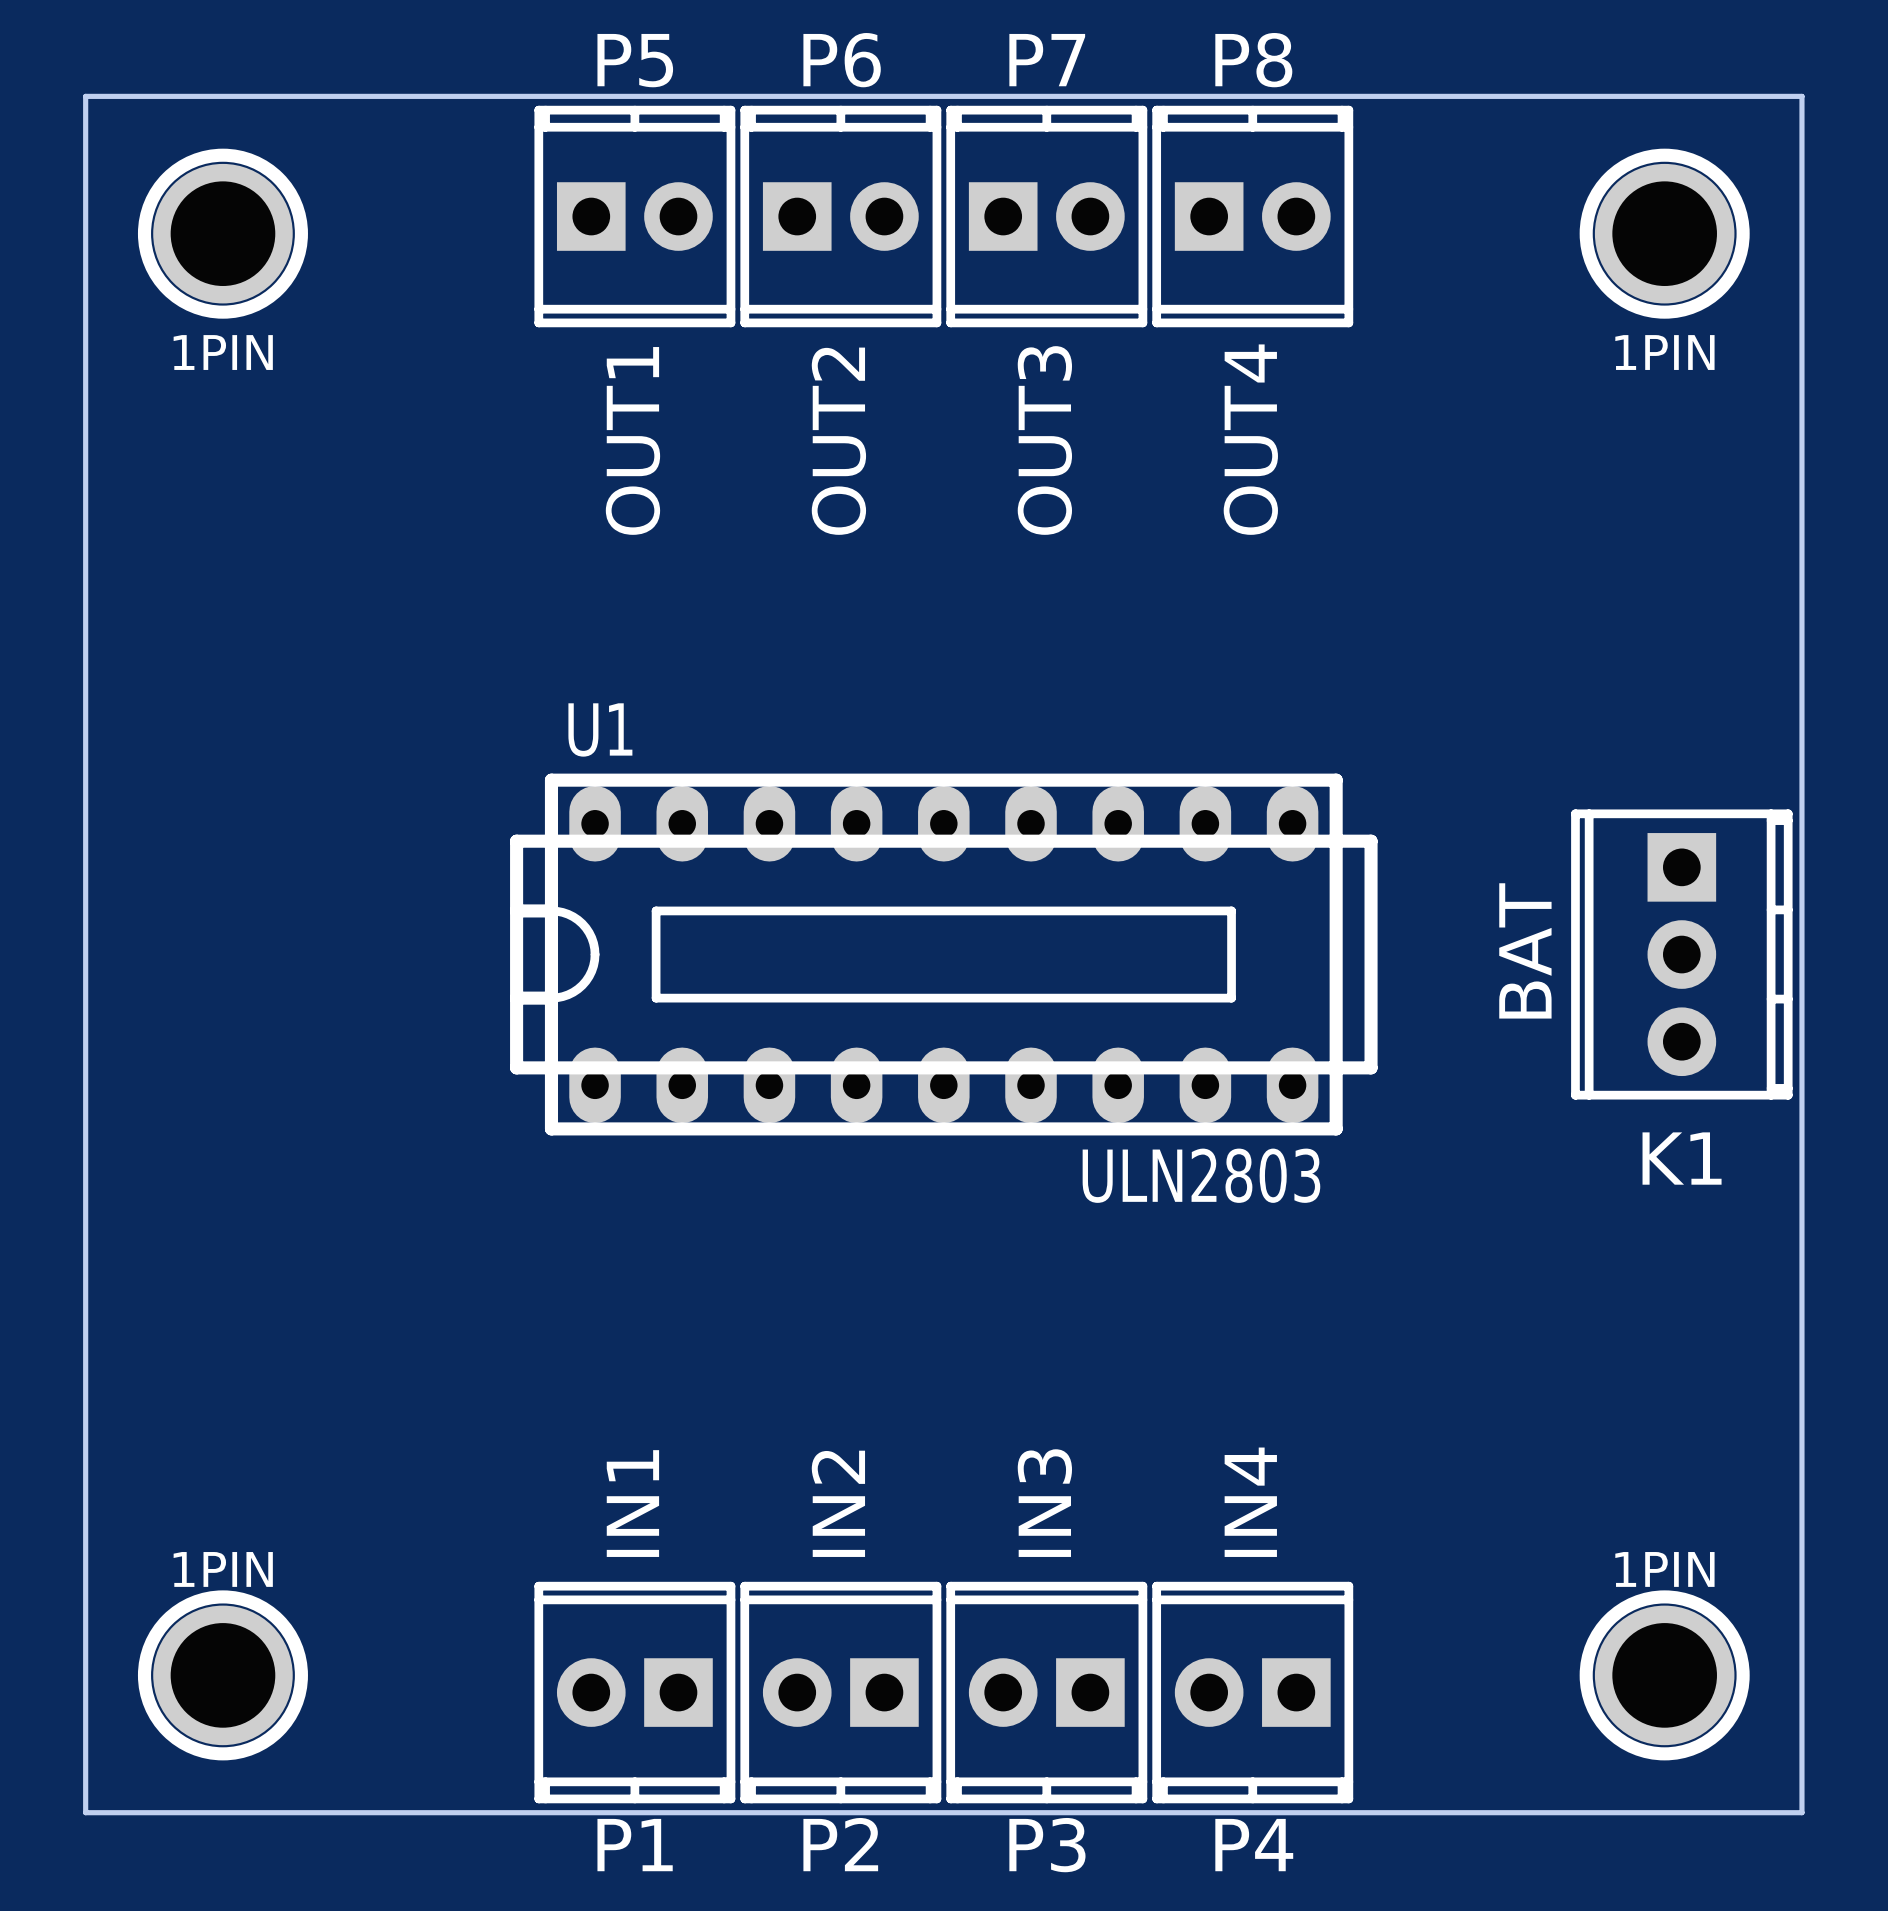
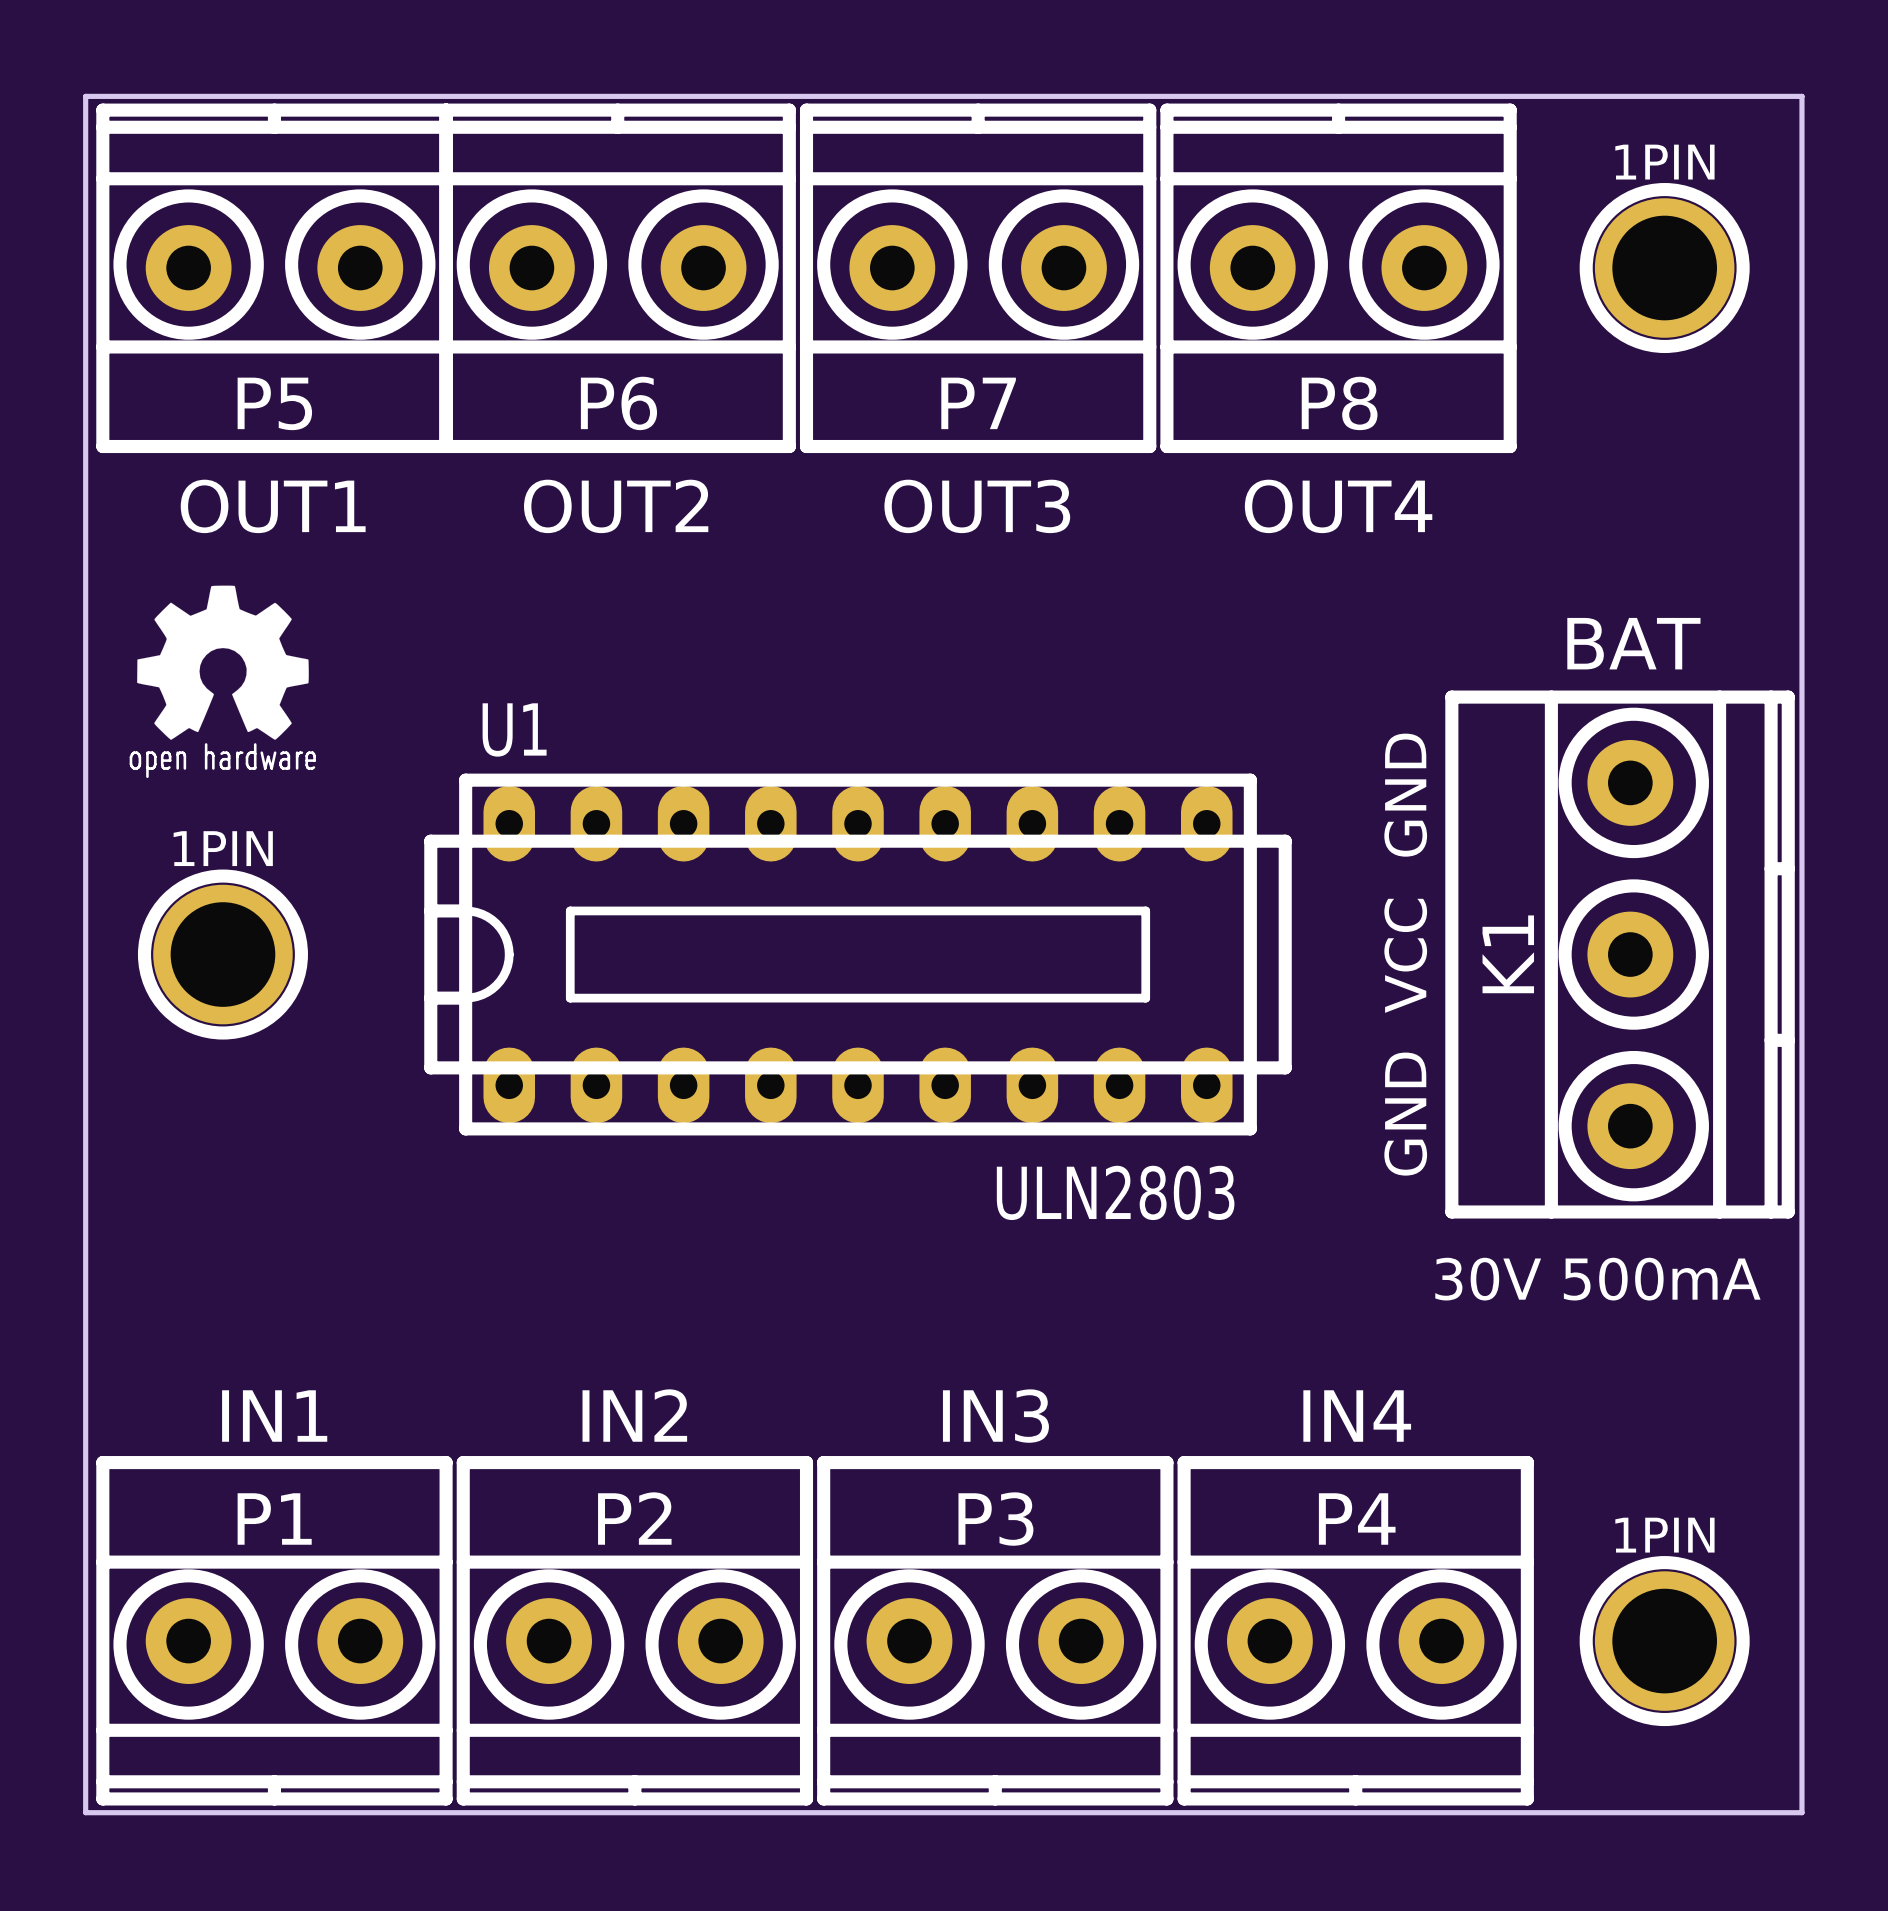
P5 name position: P5 (635, 60) -> P5 (274, 403)
P6 name position: P6 (842, 60) -> P6 (618, 403)
P7 name position: P7 (1047, 60) -> P7 (978, 403)
P8 name position: P8 (1253, 60) -> P8 (1339, 403)
P5 footprint: [534, 105, 736, 328] -> [96, 103, 453, 454]
P6 footprint: [740, 105, 942, 328] -> [439, 103, 796, 454]
P7 footprint: [946, 105, 1148, 328] -> [799, 103, 1157, 454]
P8 footprint: [1152, 105, 1354, 328] -> [1160, 103, 1517, 454]
1PIN: (222, 233) -> none
1PIN position: (1664, 233) -> (1664, 268)
1PIN name position: 1PIN (1664, 352) -> 1PIN (1664, 162)
drawing: none -> [129, 585, 316, 779]
K1 footprint: [1571, 809, 1793, 1100] -> [1445, 690, 1795, 1219]
K1 value position: BAT (1525, 950) -> BAT (1633, 643)
1PIN: none -> (222, 954)
U1 position: (943, 954) -> (858, 954)
text: none -> GND VCC GND (1405, 954)
K1 name position: K1 (1682, 1158) -> K1 (1508, 954)
U1 value position: ULN2803 (1201, 1175) -> ULN2803 (1115, 1192)
text: none -> 30V 500mA (1597, 1279)
P1 footprint: [534, 1581, 736, 1804] -> [96, 1456, 453, 1806]
P2 footprint: [740, 1581, 942, 1804] -> [456, 1456, 814, 1806]
P3 footprint: [946, 1581, 1148, 1804] -> [817, 1456, 1174, 1806]
P4 footprint: [1152, 1581, 1354, 1804] -> [1177, 1456, 1534, 1806]
1PIN: (222, 1675) -> none
1PIN position: (1664, 1675) -> (1664, 1641)
P2 name position: P2 (840, 1844) -> P2 (634, 1518)
P1 name position: P1 (635, 1845) -> P1 (274, 1518)
P3 name position: P3 (1047, 1845) -> P3 (995, 1519)
P4 name position: P4 (1254, 1845) -> P4 (1357, 1518)

